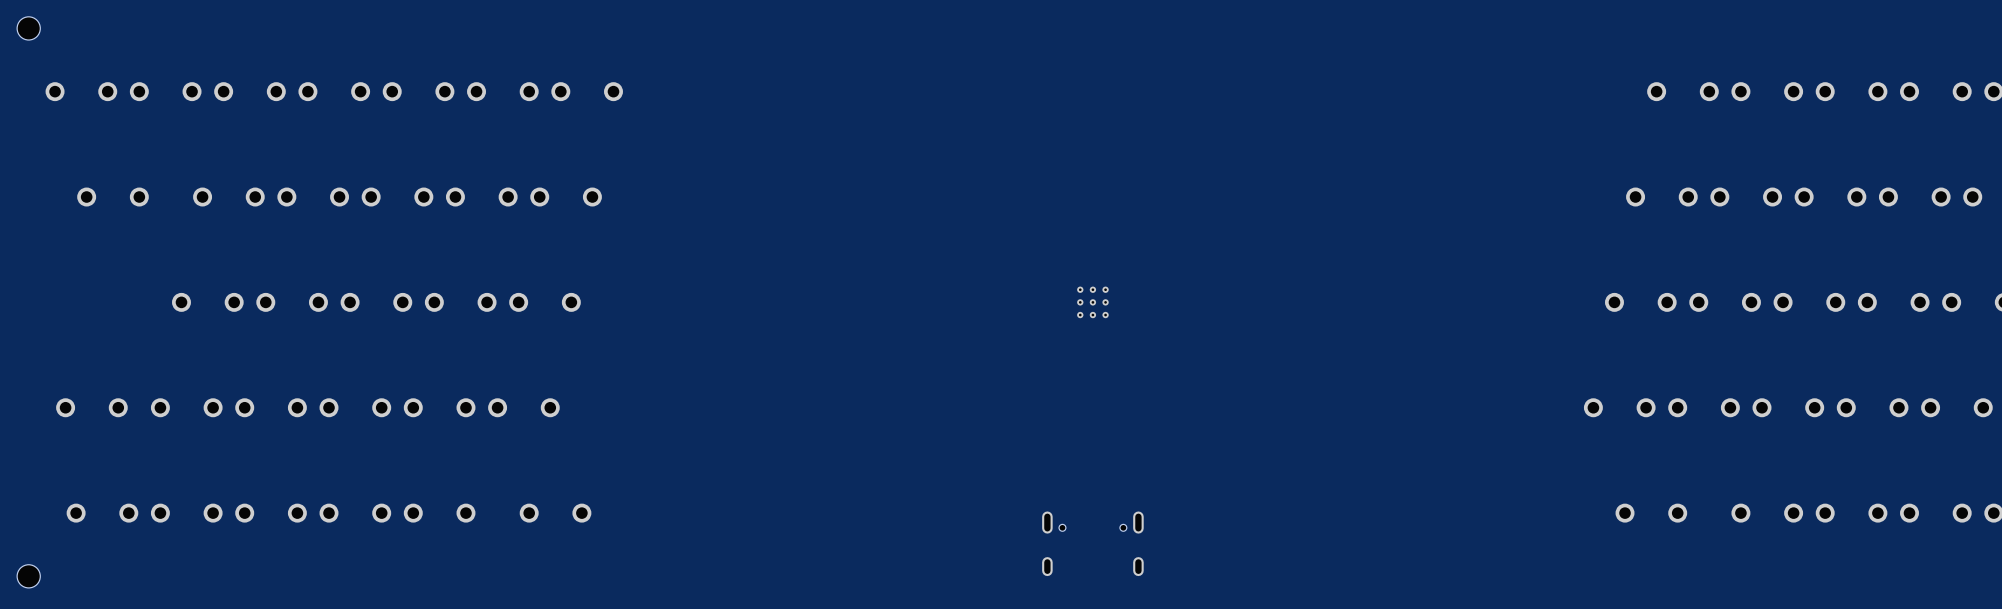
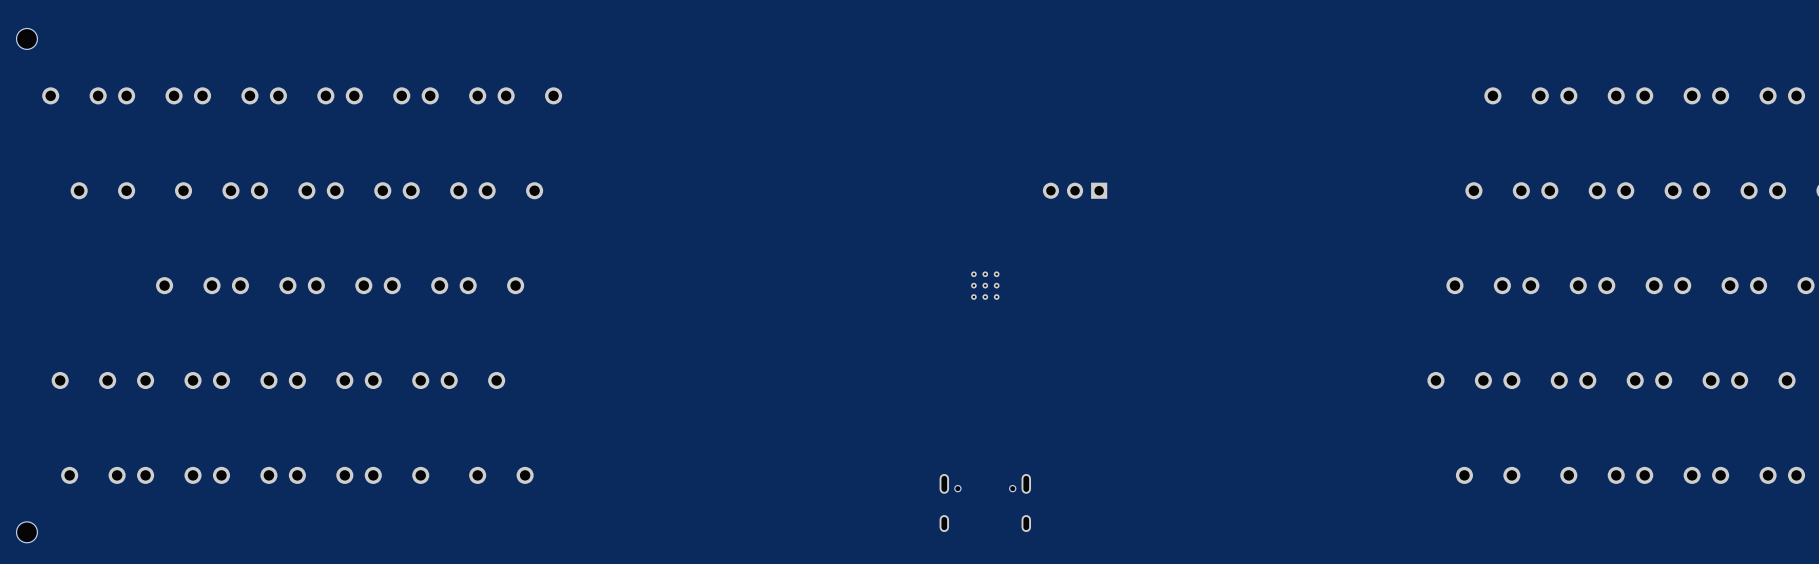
part: none -> (1075, 190)

